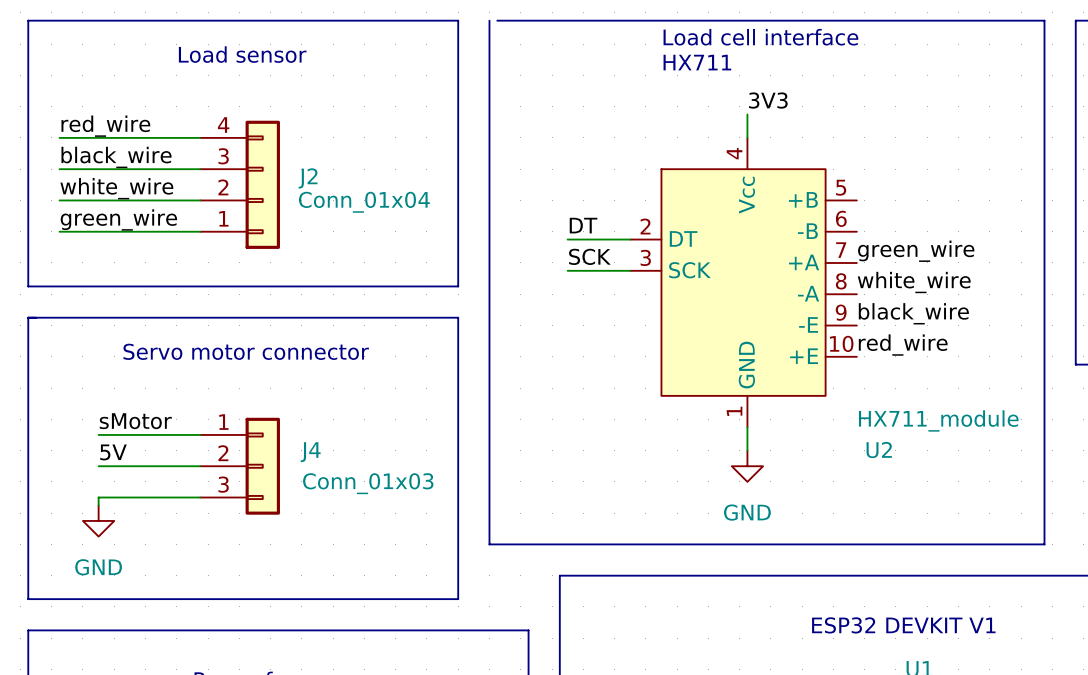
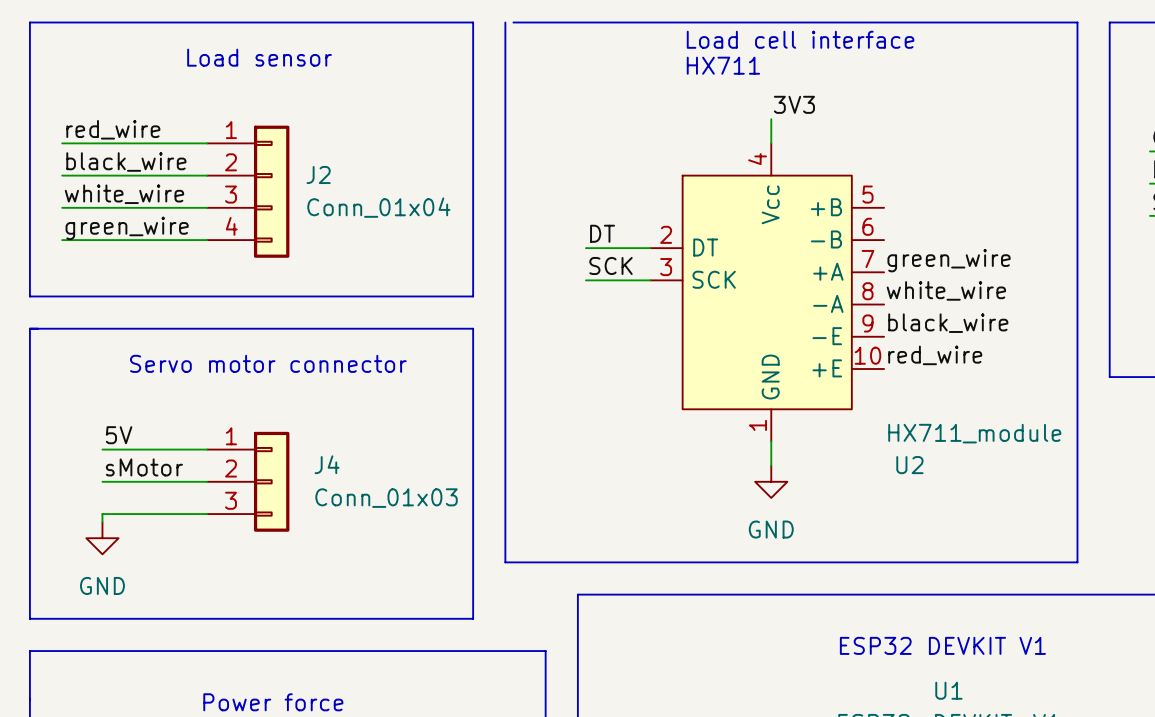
J2 flip: as is (262, 184) -> up-down (271, 191)
label: sMotor (135, 421) -> 5V (119, 435)
label: 5V (113, 452) -> sMotor (144, 467)

